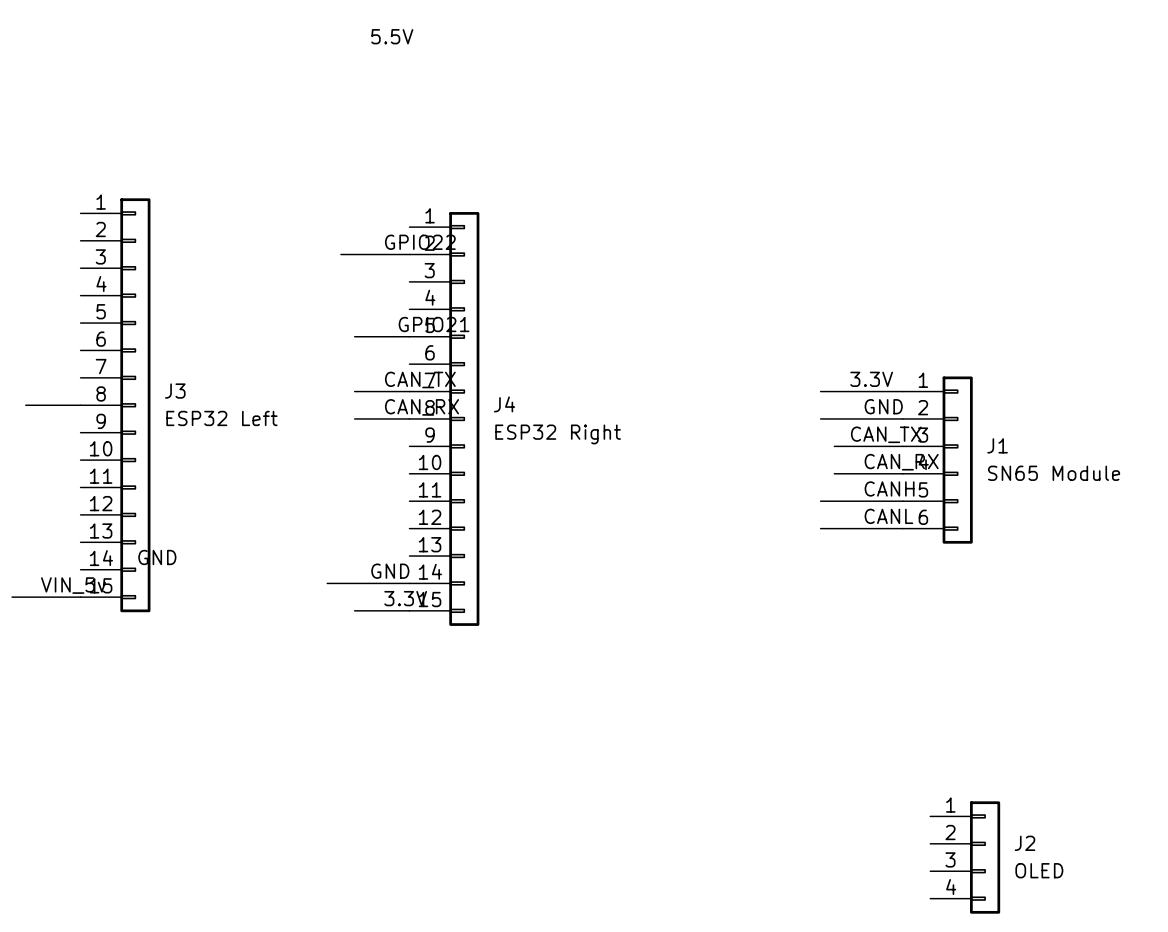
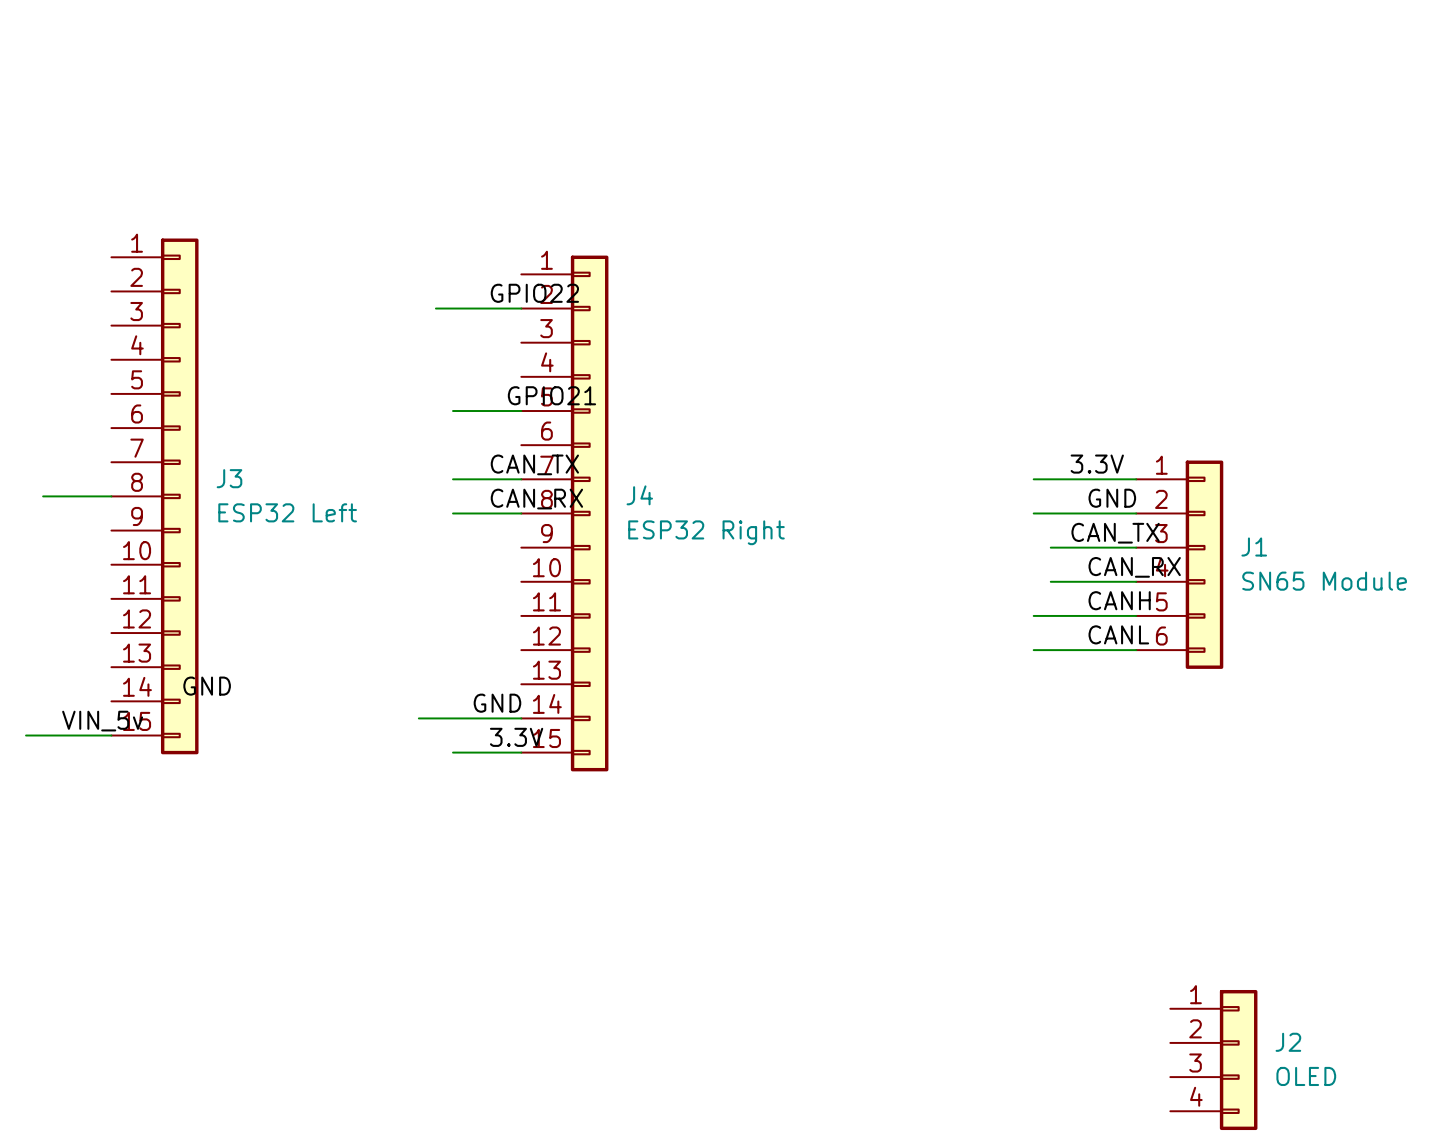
label: 5.5V (392, 36) -> none

